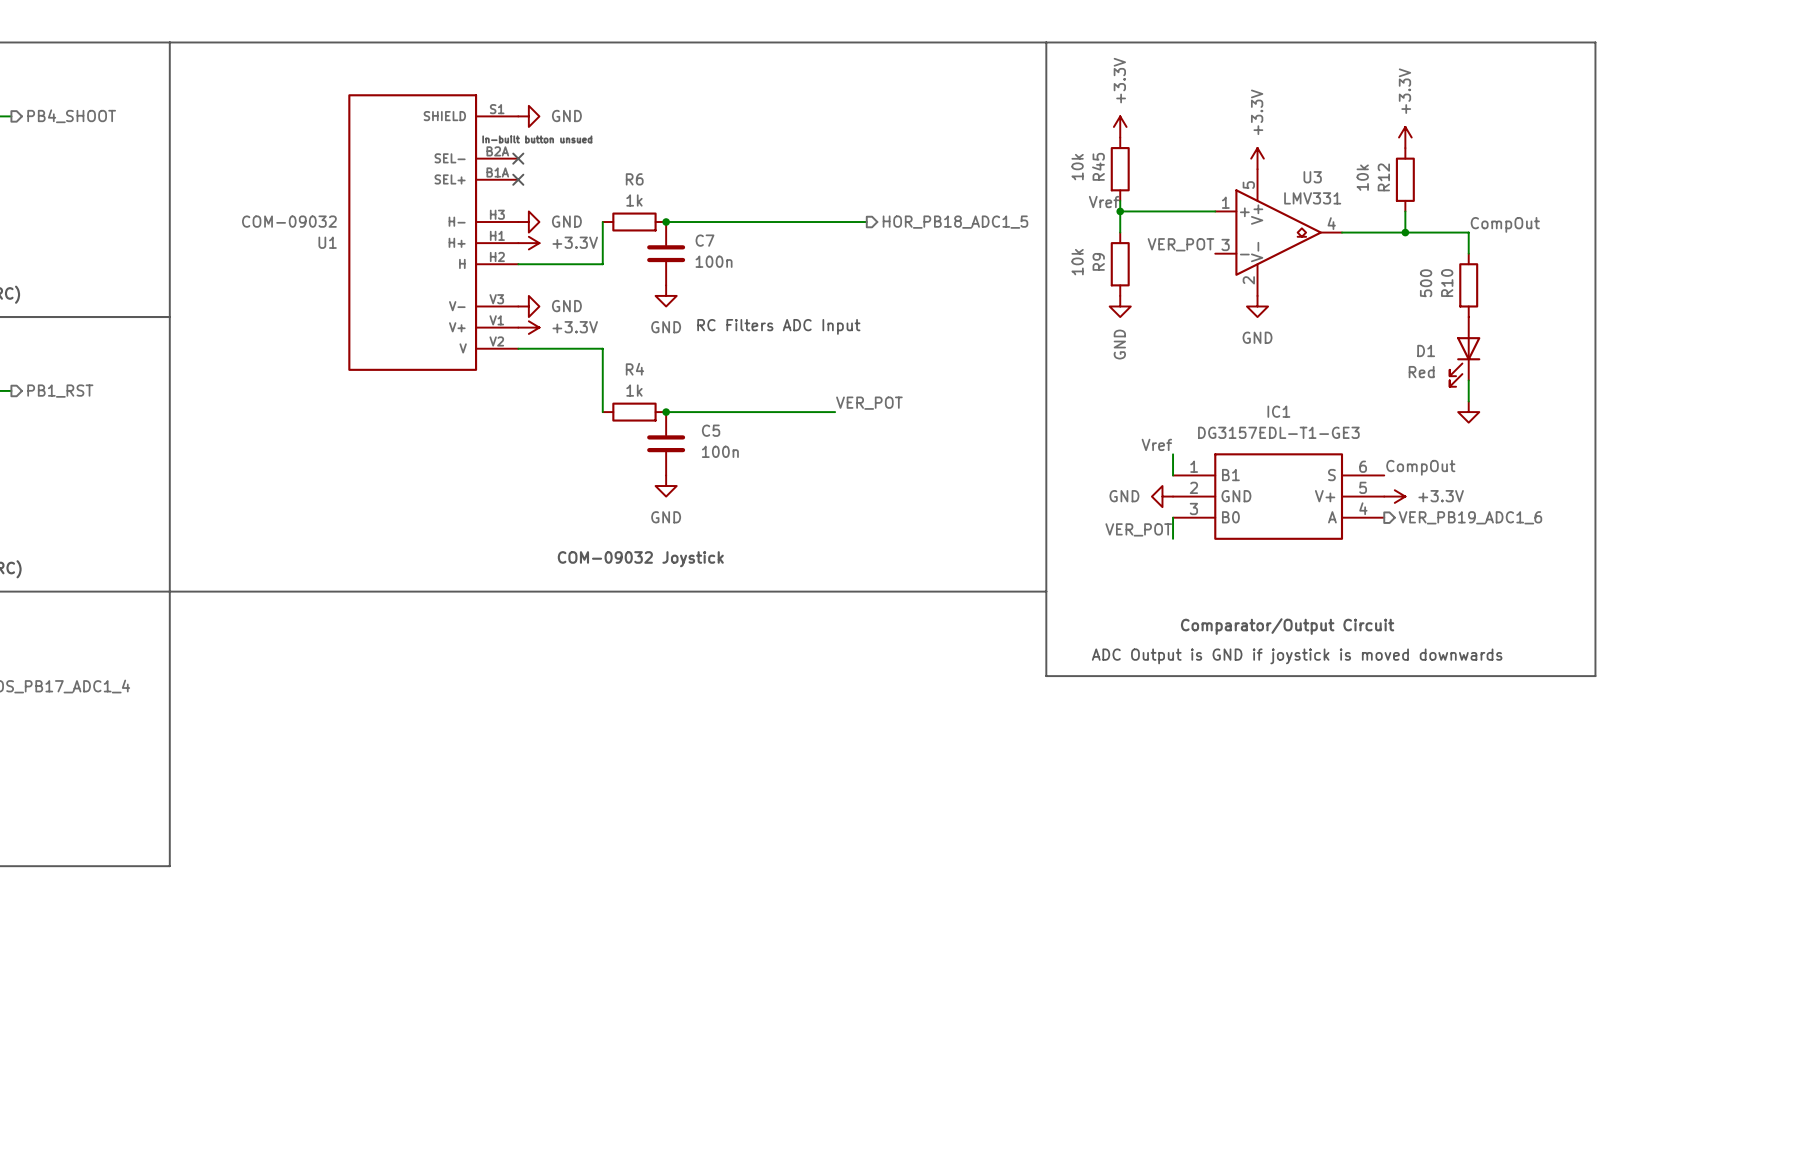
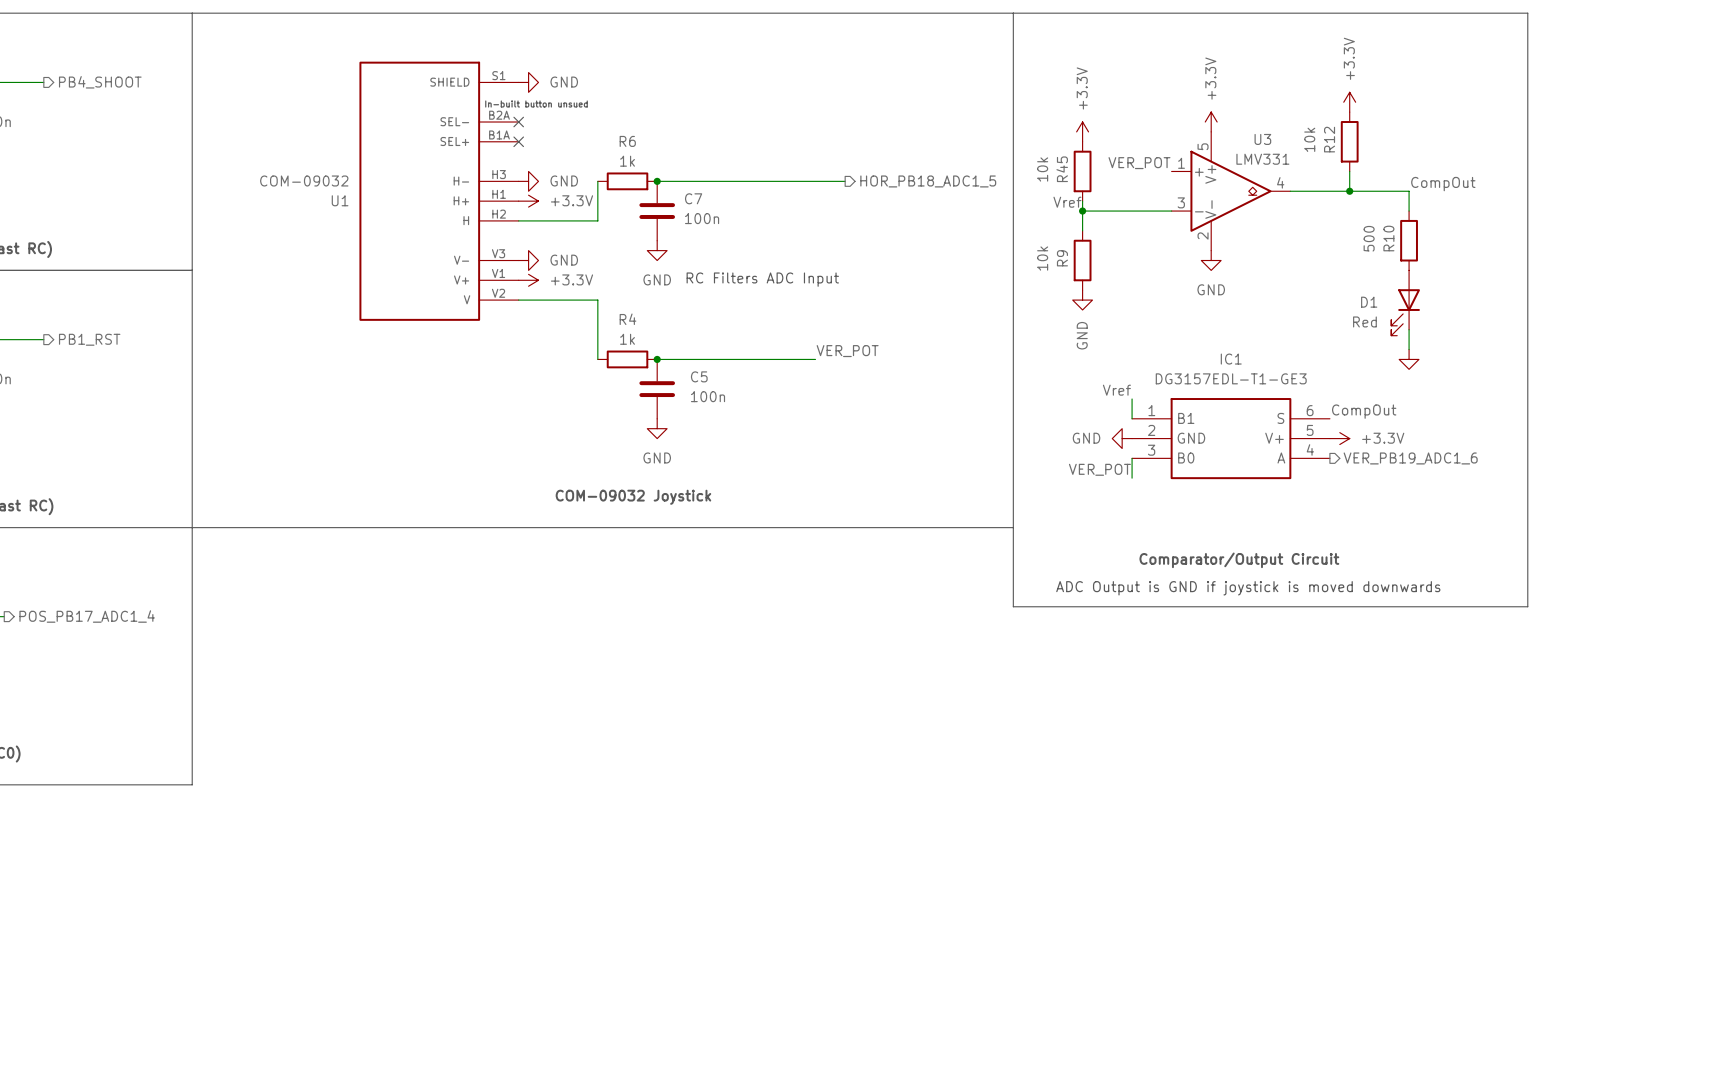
power symbol position: +3.3V (1120, 126) -> +3.3V (1082, 131)
R45 position: (1120, 169) -> (1082, 171)
wire: (1120, 200) (1120, 232) -> (1082, 201) (1082, 230)
label position: Vref (1104, 202) -> Vref (1067, 202)
wire: (1120, 211) (1215, 211) -> (1082, 211) (1171, 211)
junction position: (1120, 211) -> (1082, 211)
label position: VER_POT (1180, 244) -> VER_POT (1139, 163)
R9 position: (1120, 264) -> (1082, 260)
power symbol position: GND (1120, 306) -> GND (1082, 300)

